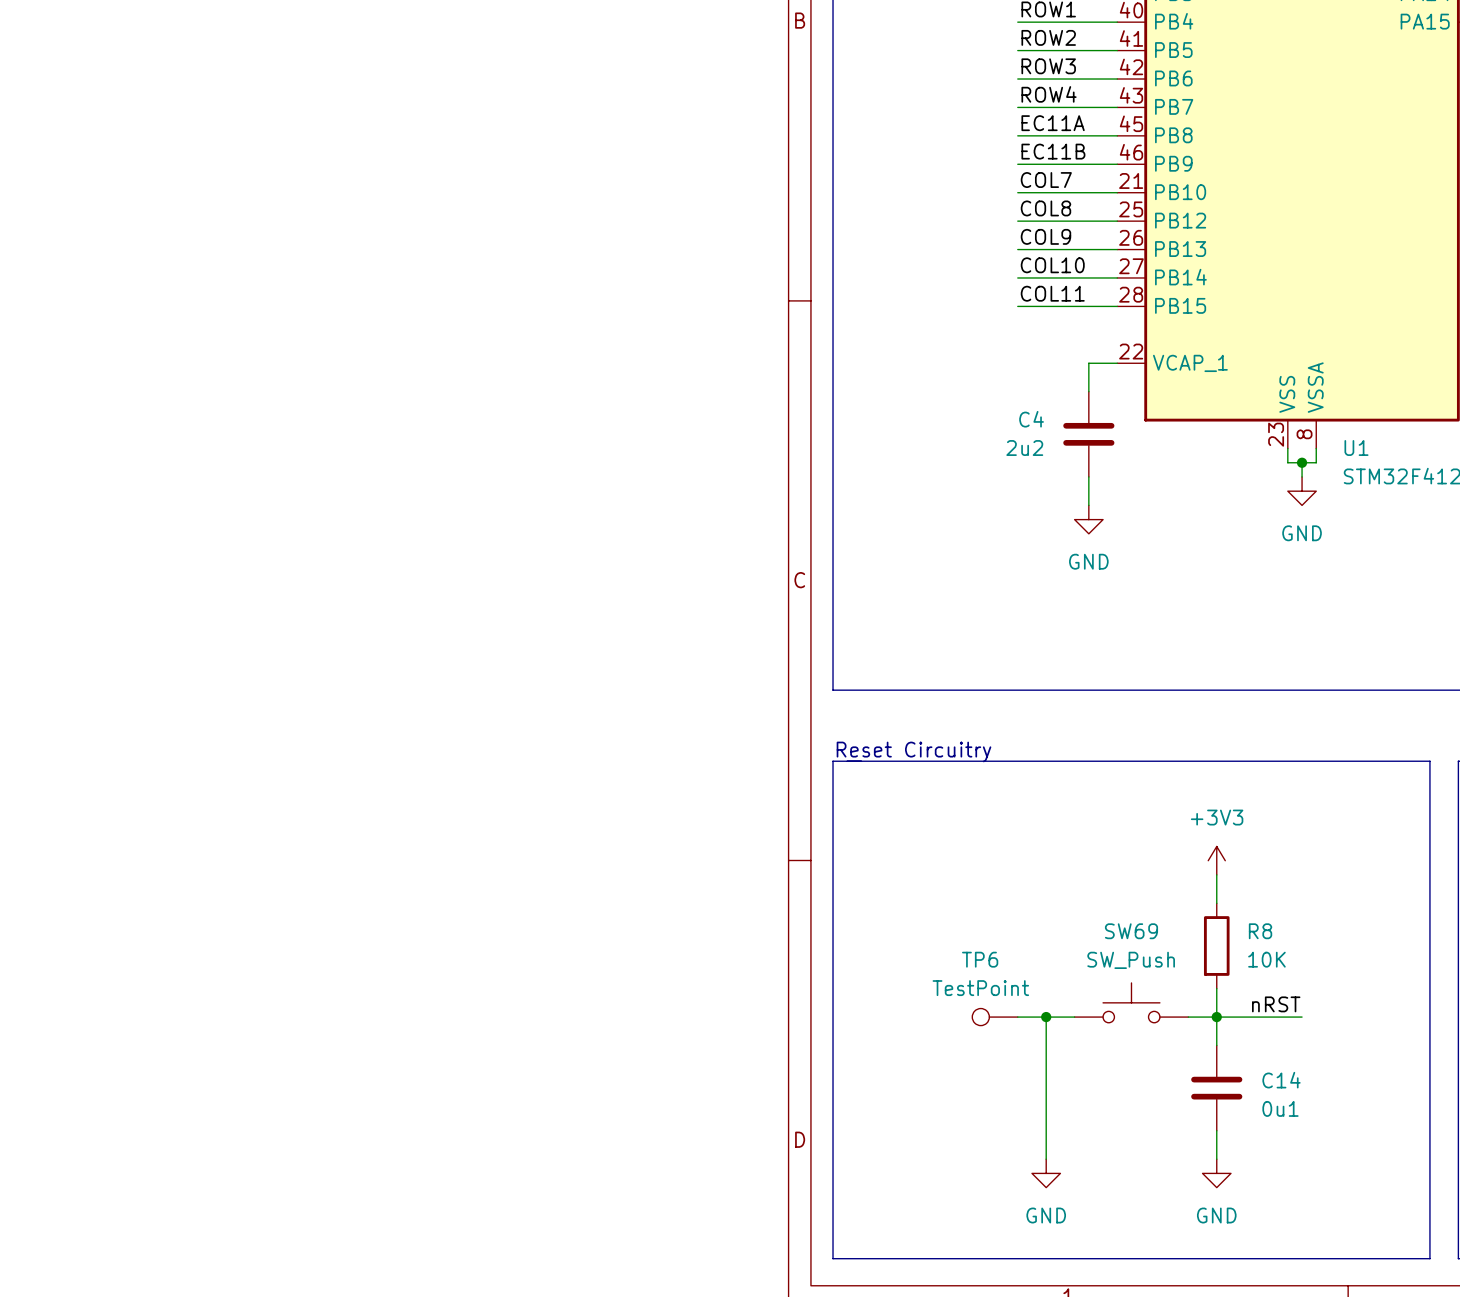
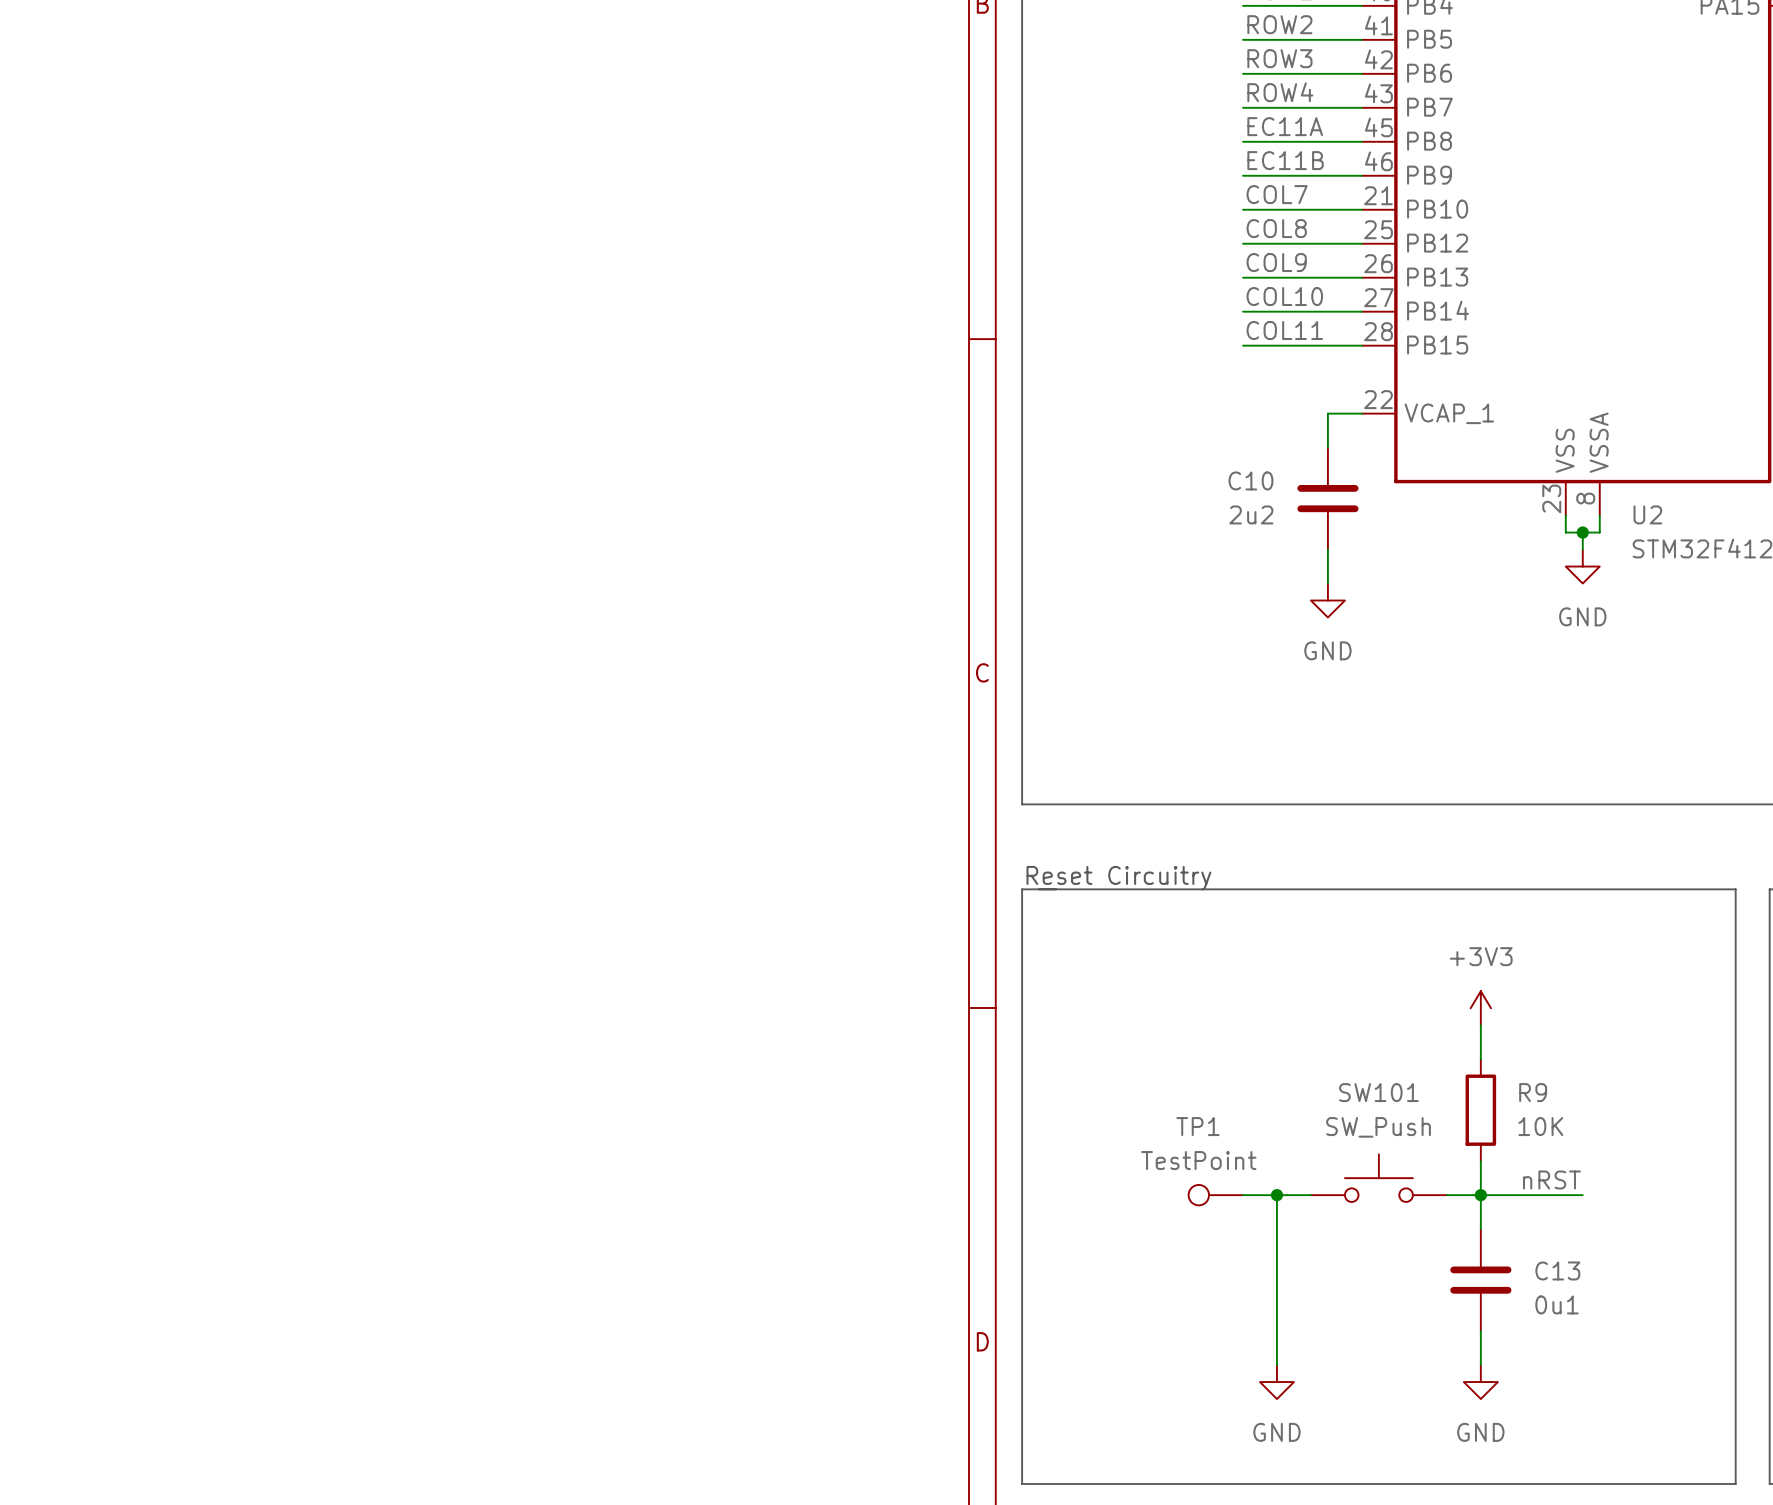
C4 name: C4 (1031, 419) -> C10 (1250, 480)
U1 name: U1 (1356, 448) -> U2 (1647, 514)
SW69 name: SW69 (1131, 931) -> SW101 (1378, 1092)
R8 name: R8 (1260, 931) -> R9 (1533, 1092)
TP6 name: TP6 (980, 959) -> TP1 (1198, 1126)
C14 name: C14 (1281, 1080) -> C13 (1557, 1270)

